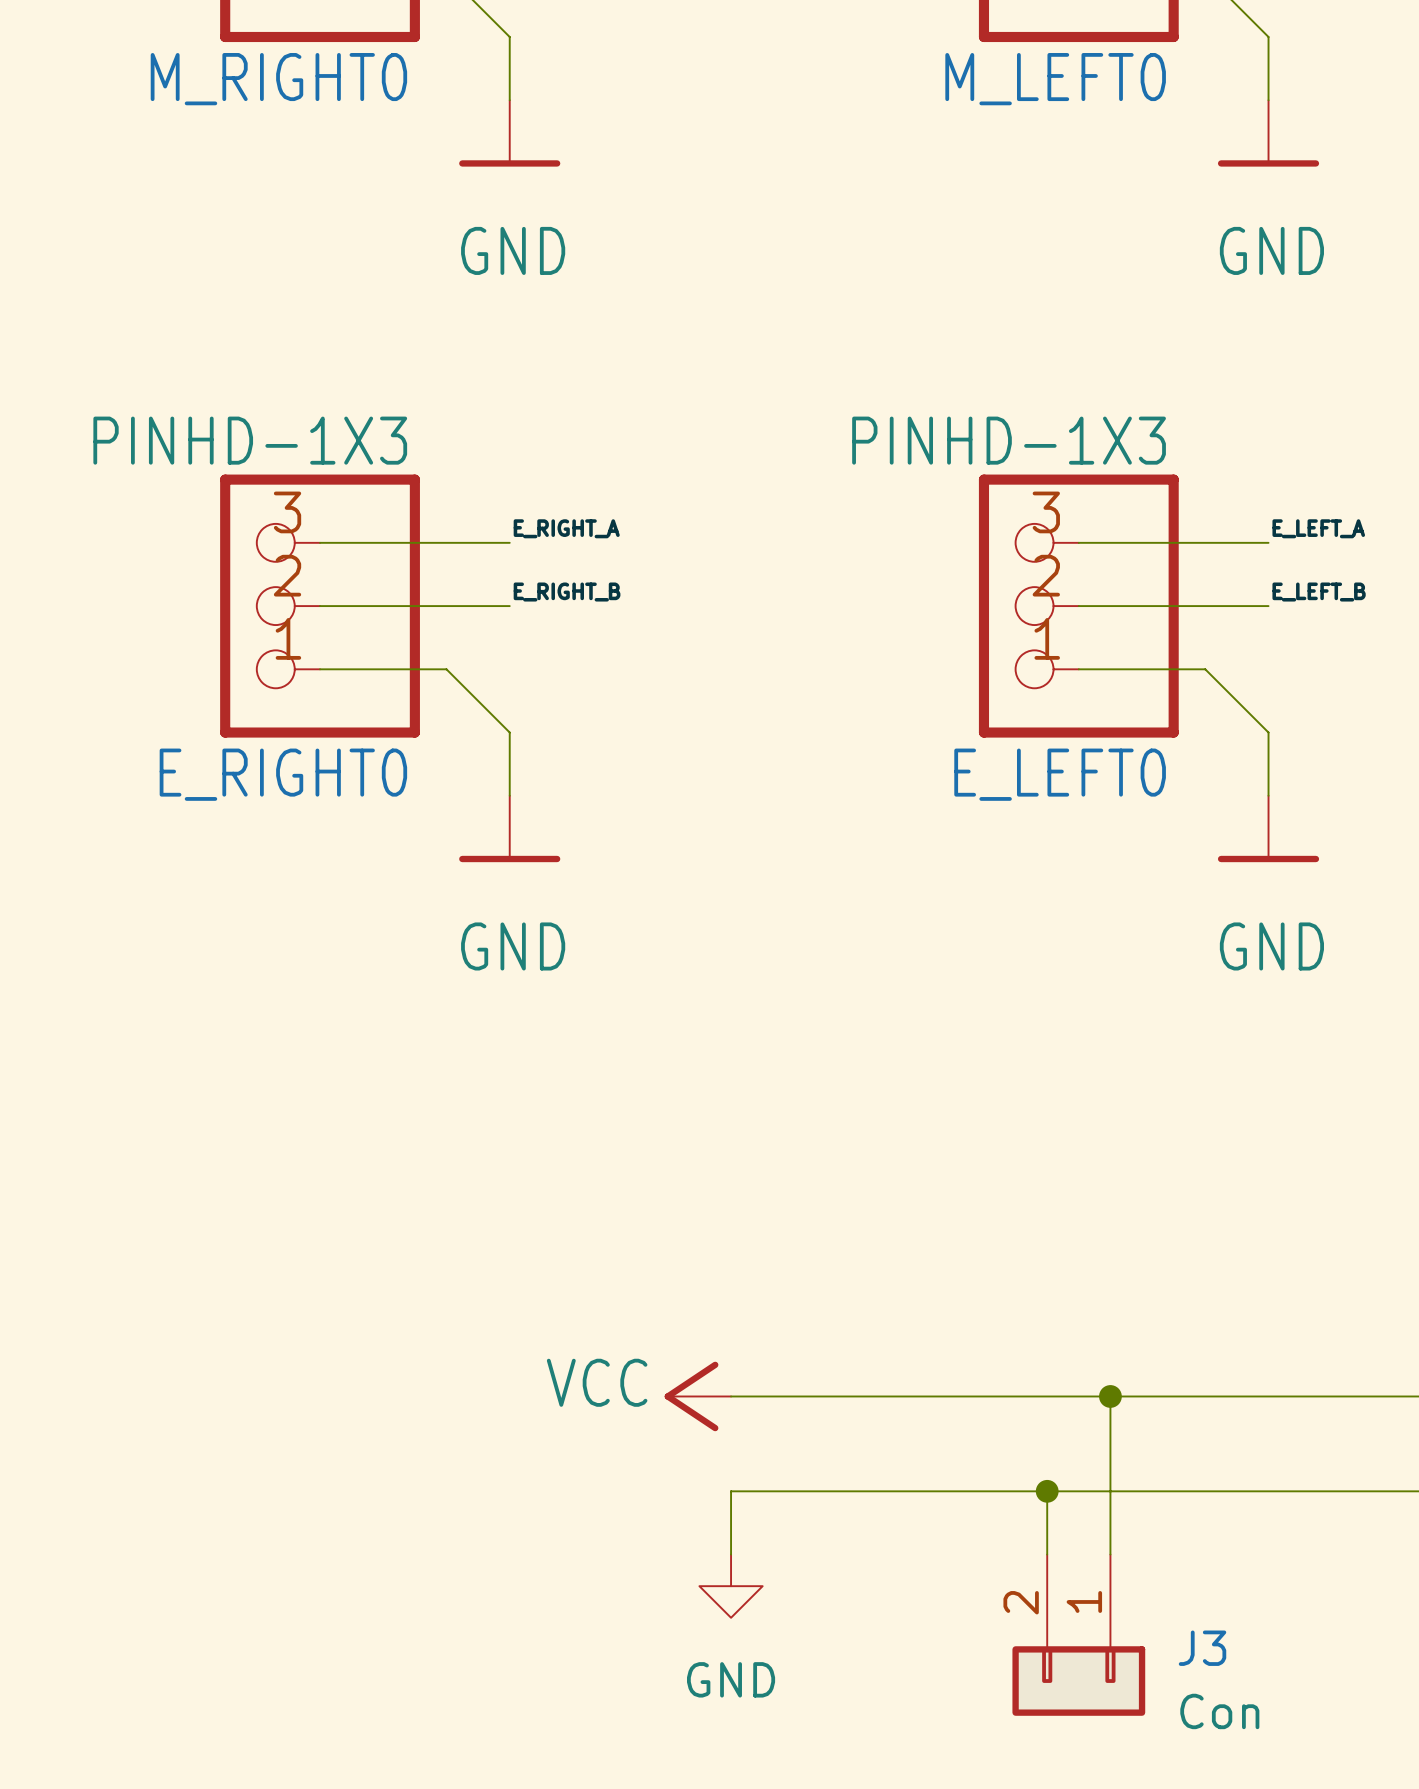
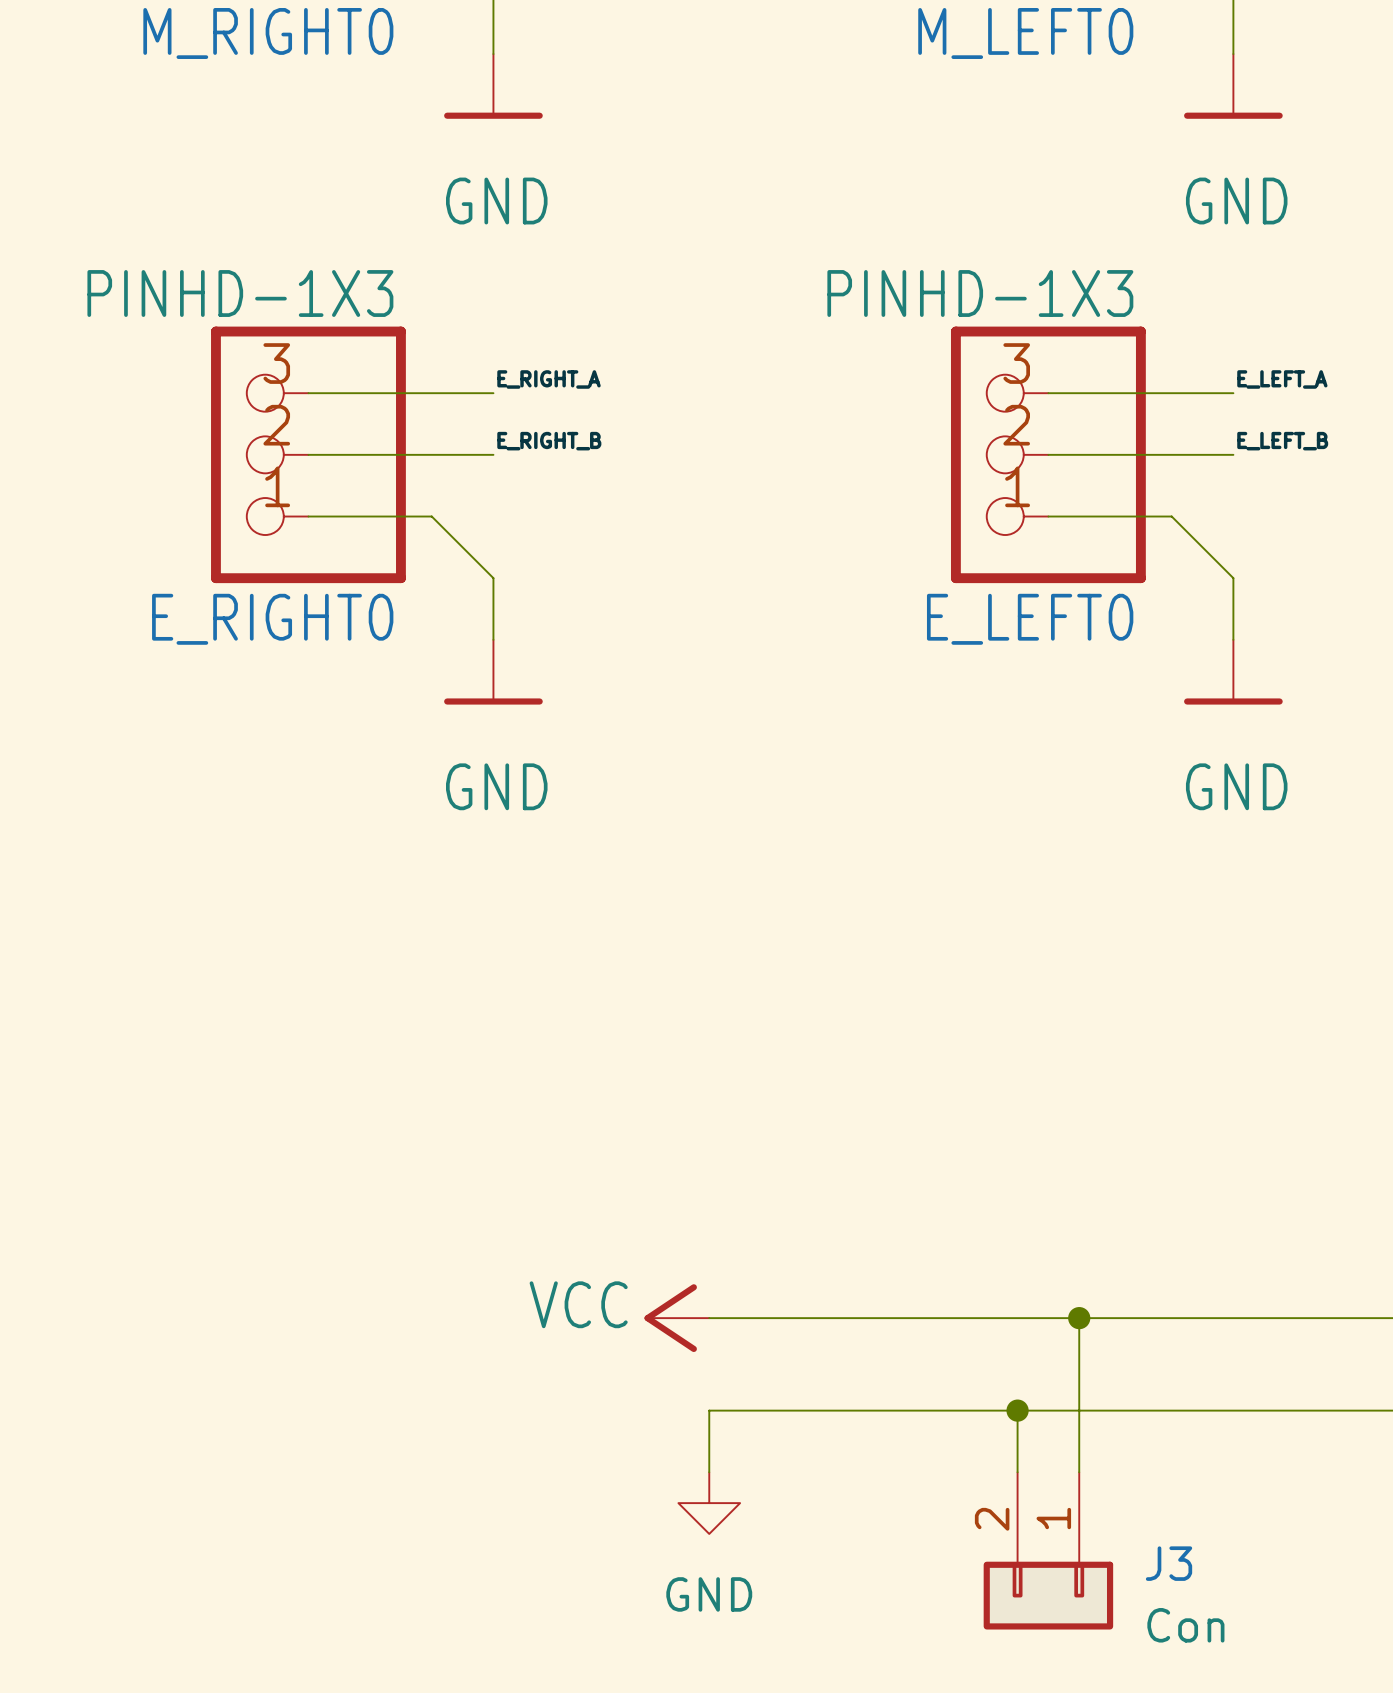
label position: E_RIGHT_A (566, 528) -> E_RIGHT_A (548, 379)
label position: E_LEFT_A (1318, 528) -> E_LEFT_A (1282, 379)
wire: (320, 542) (509, 542) -> (308, 393) (493, 393)
wire: (1078, 542) (1268, 542) -> (1048, 393) (1233, 393)
label position: E_RIGHT_B (567, 592) -> E_RIGHT_B (549, 441)
label position: E_LEFT_B (1319, 592) -> E_LEFT_B (1282, 441)
wire: (320, 606) (509, 606) -> (308, 454) (493, 454)
E_RIGHT0 position: (320, 606) -> (308, 454)
wire: (1078, 606) (1268, 606) -> (1048, 454) (1233, 454)
E_LEFT0 position: (1078, 606) -> (1048, 454)
wire: (320, 669) (446, 669) (509, 732) (509, 795) -> (308, 516) (431, 516) (493, 578) (493, 639)
wire: (1078, 669) (1205, 669) (1268, 732) (1268, 795) -> (1048, 516) (1171, 516) (1233, 578) (1233, 639)
power symbol position: GND (509, 828) -> GND (493, 672)
power symbol position: GND (1268, 828) -> GND (1233, 672)

